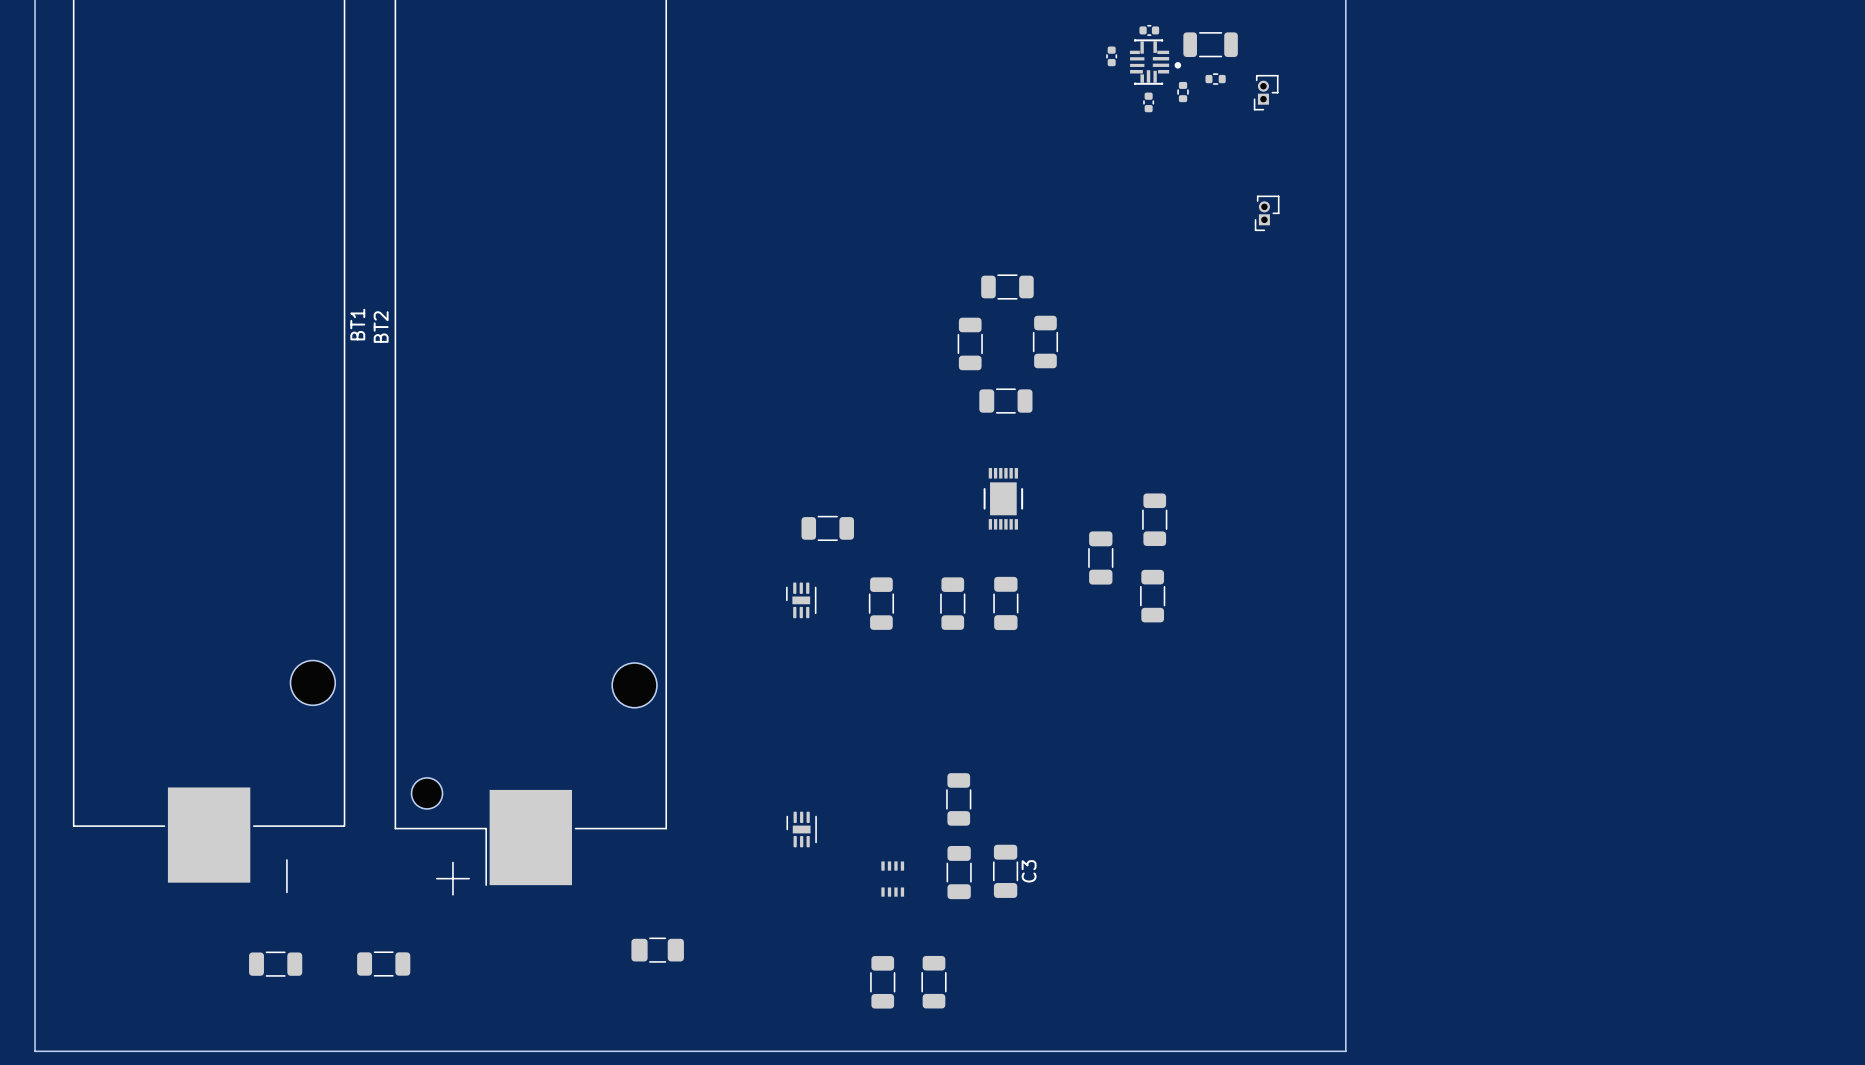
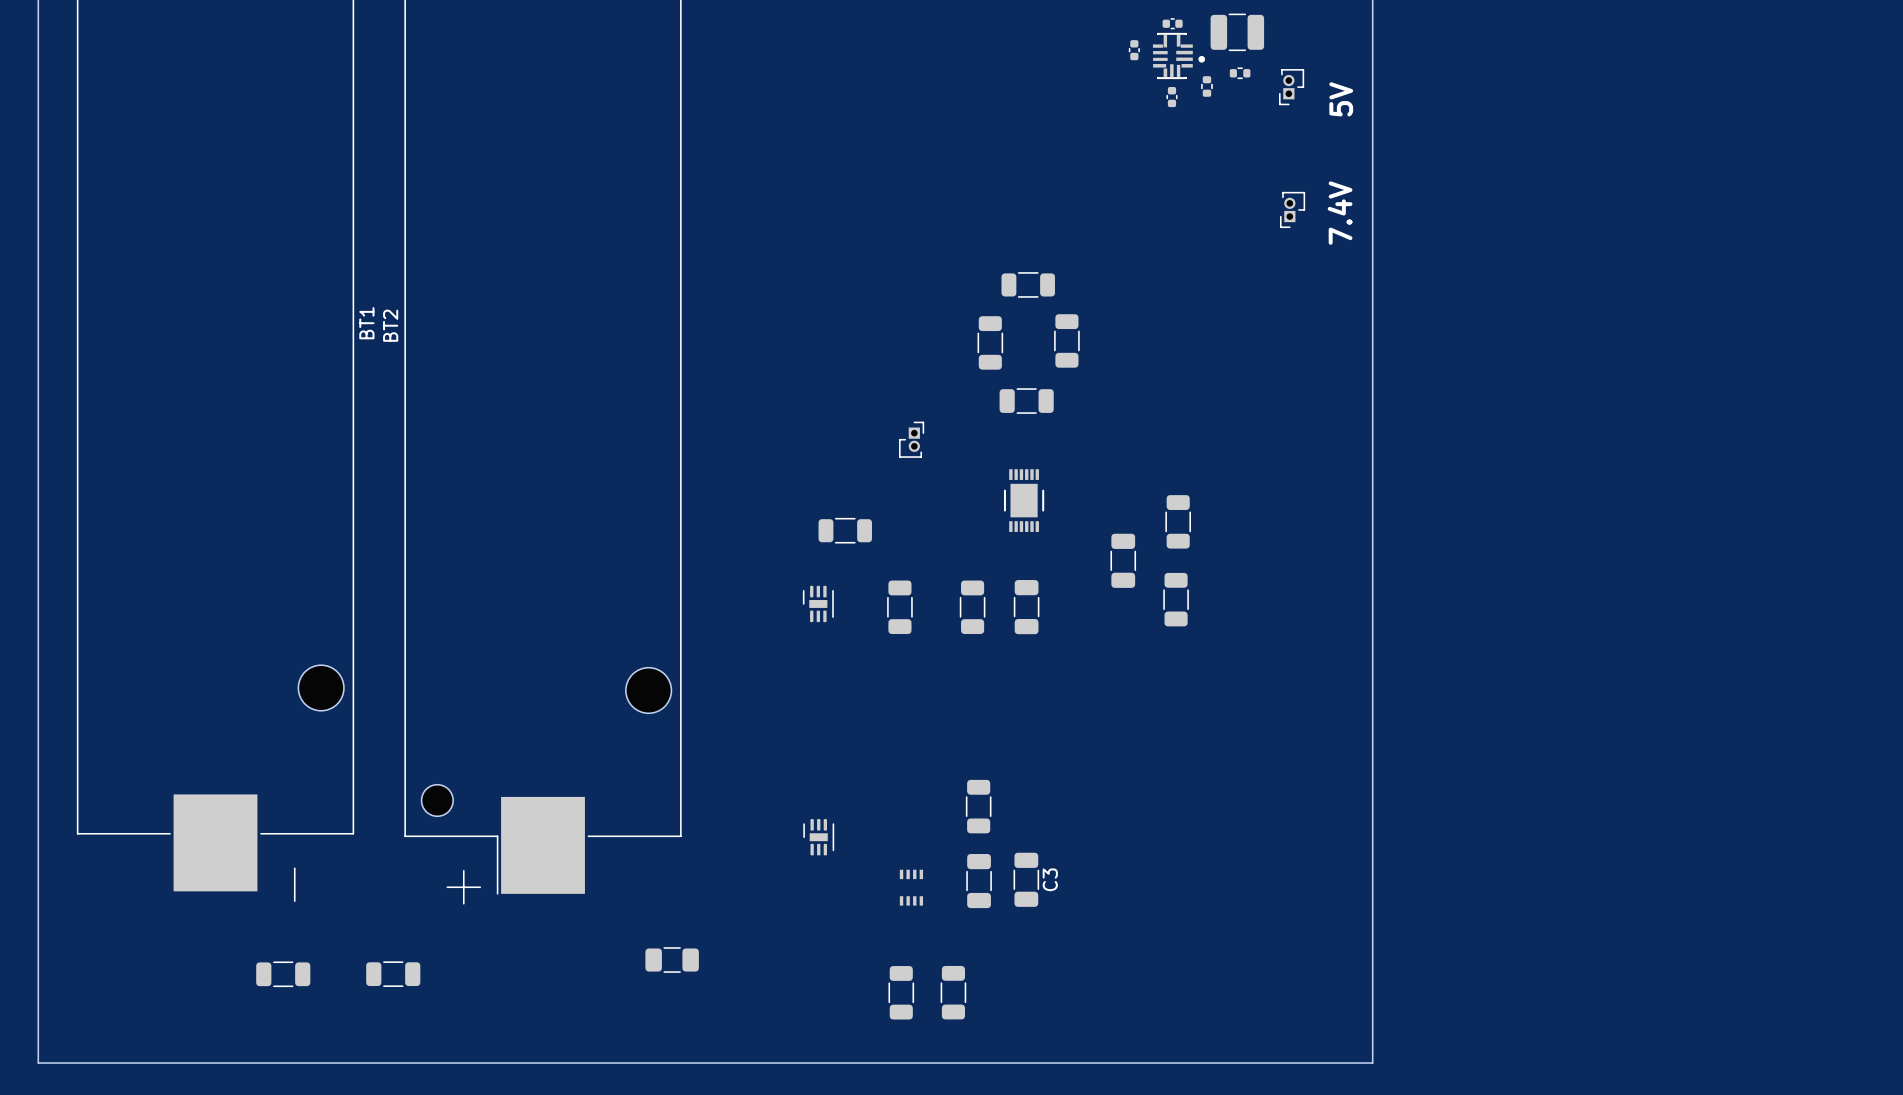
part footprint: [1183, 32, 1238, 58] -> [1210, 13, 1265, 52]
text: none -> 5V (1341, 99)
text: none -> 7.4V (1340, 213)
part: none -> (911, 439)

